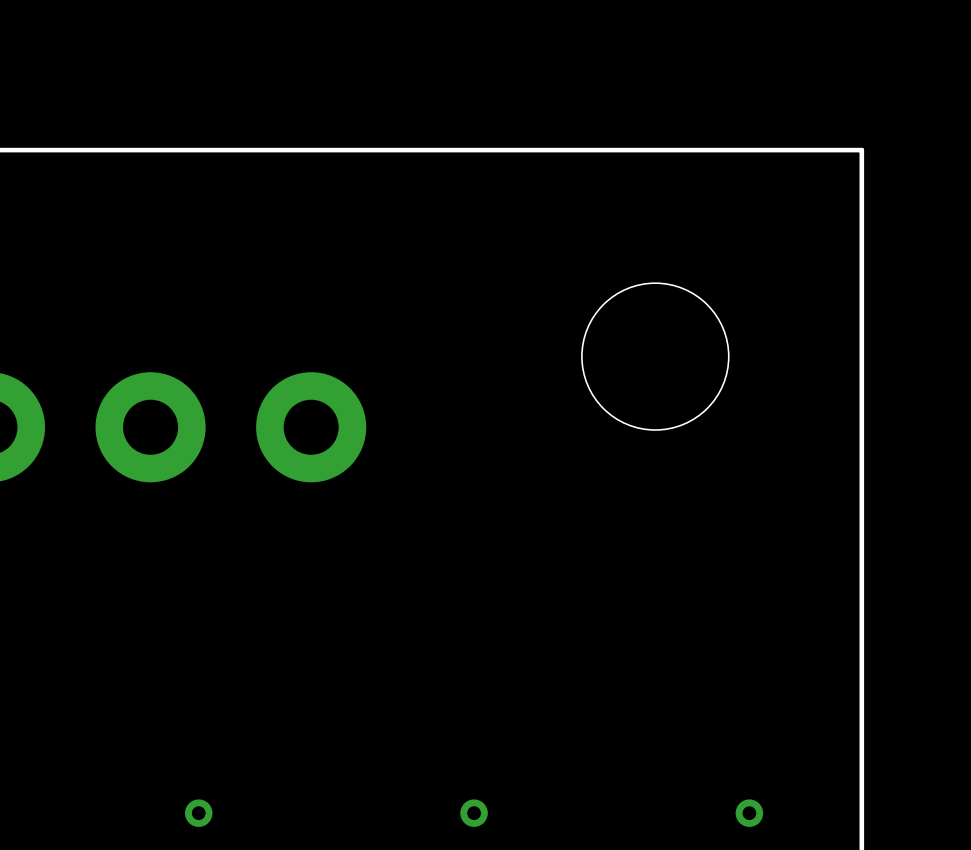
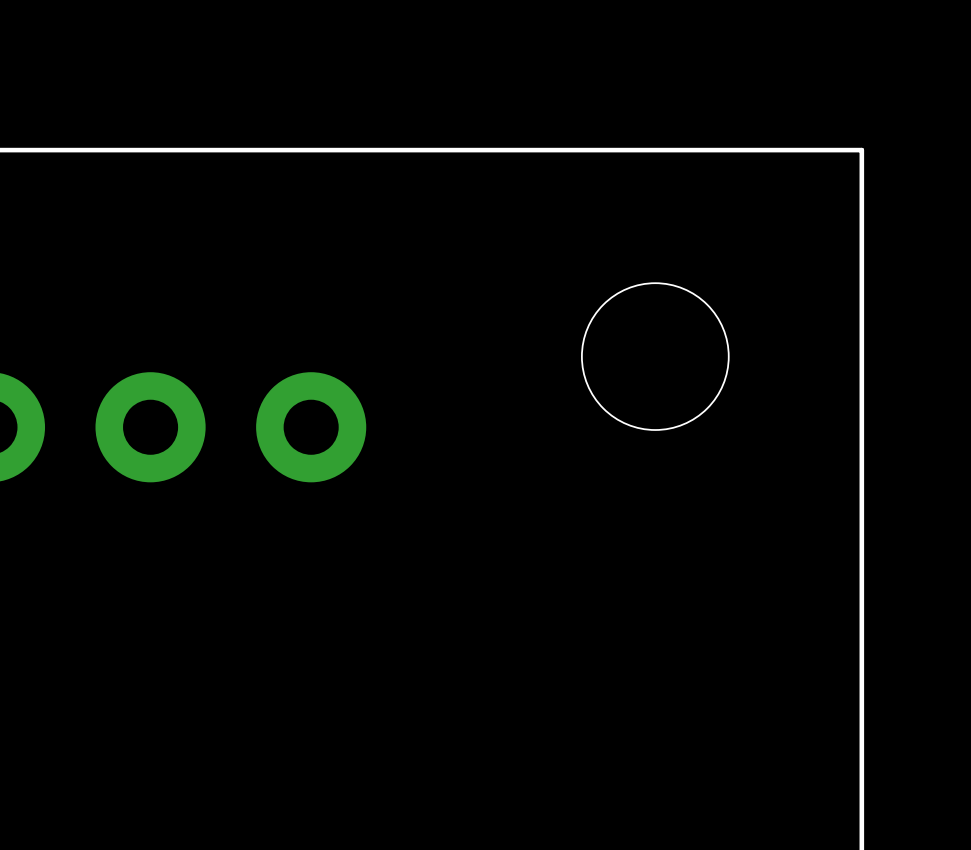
via: (198, 813) -> none
via: (474, 813) -> none
via: (749, 813) -> none

